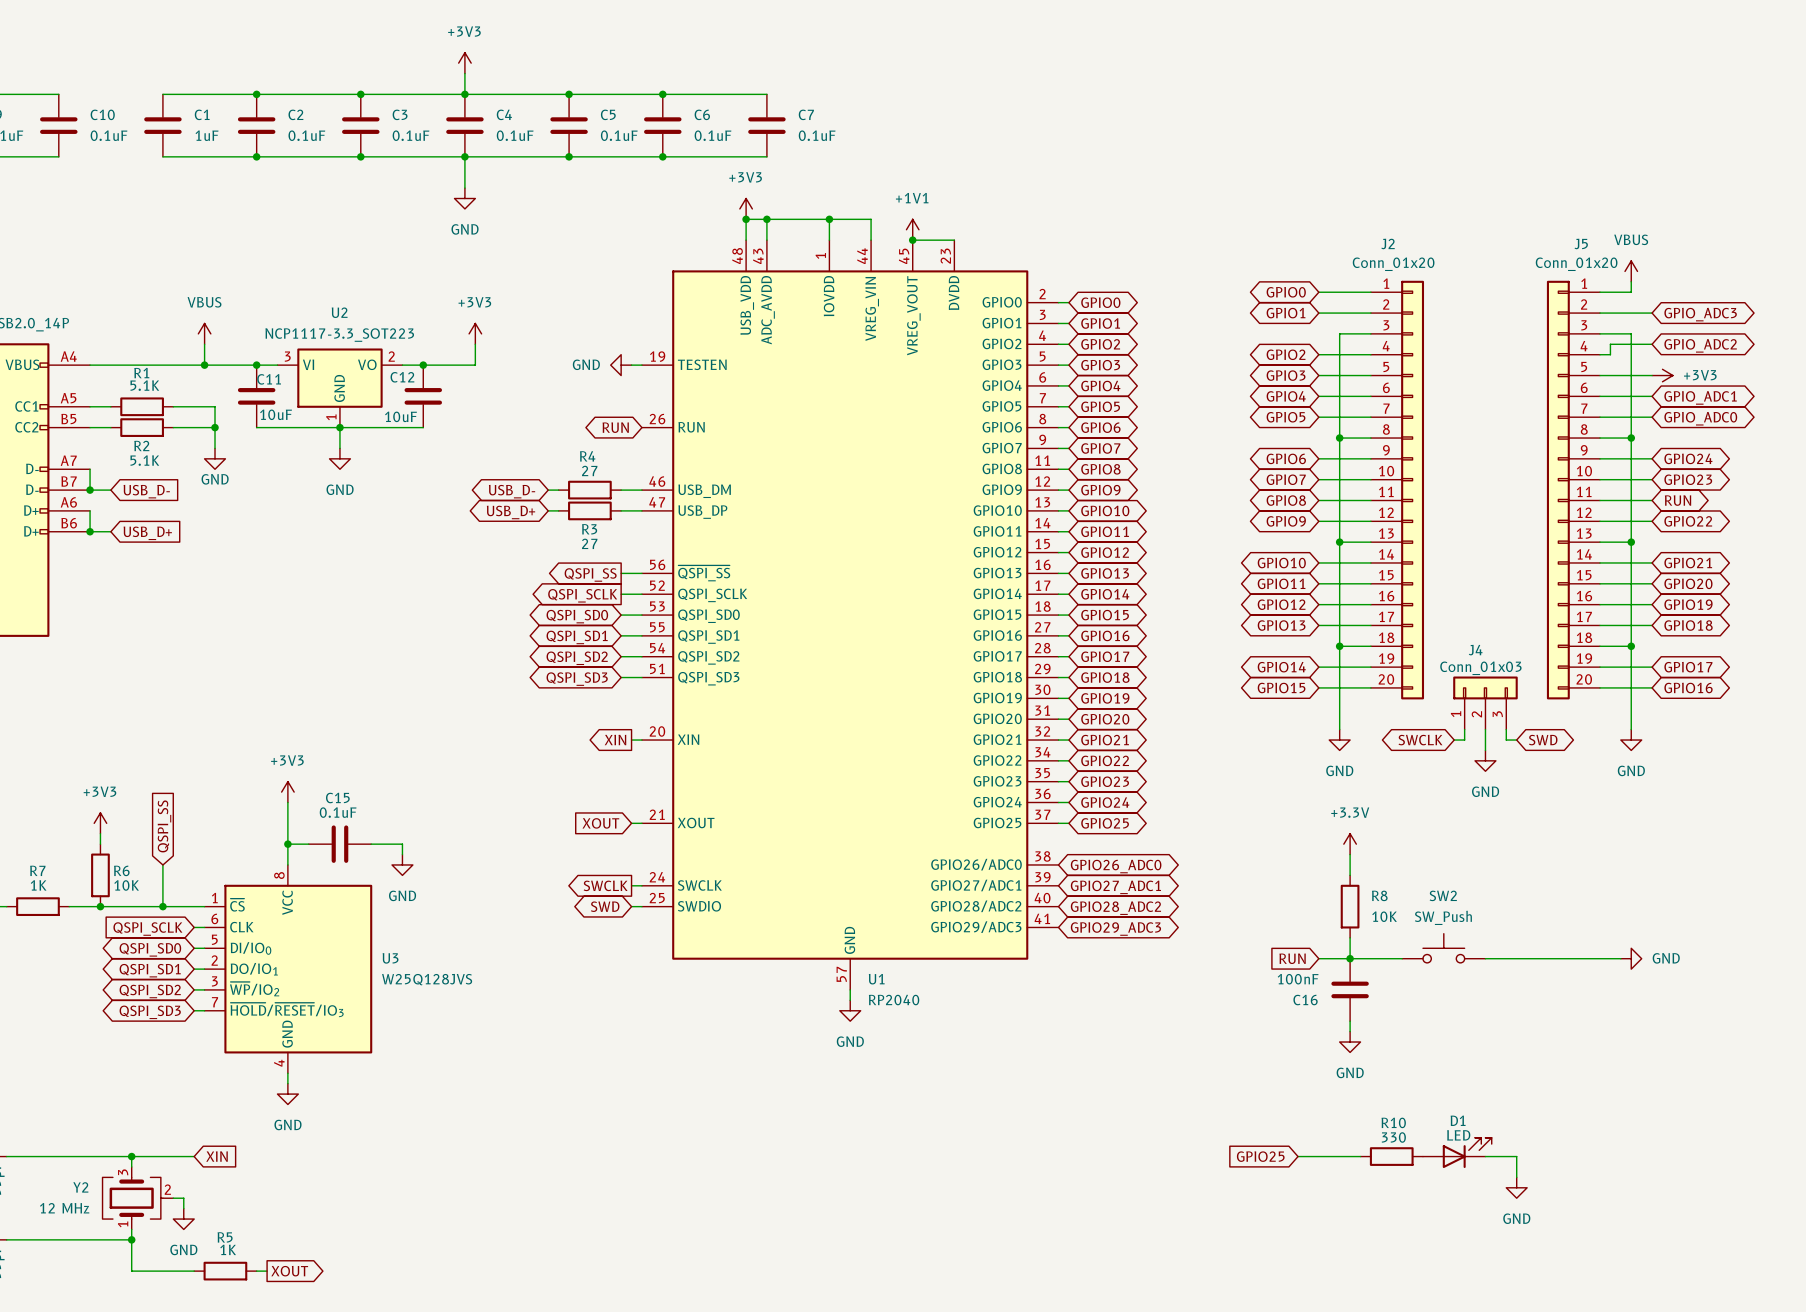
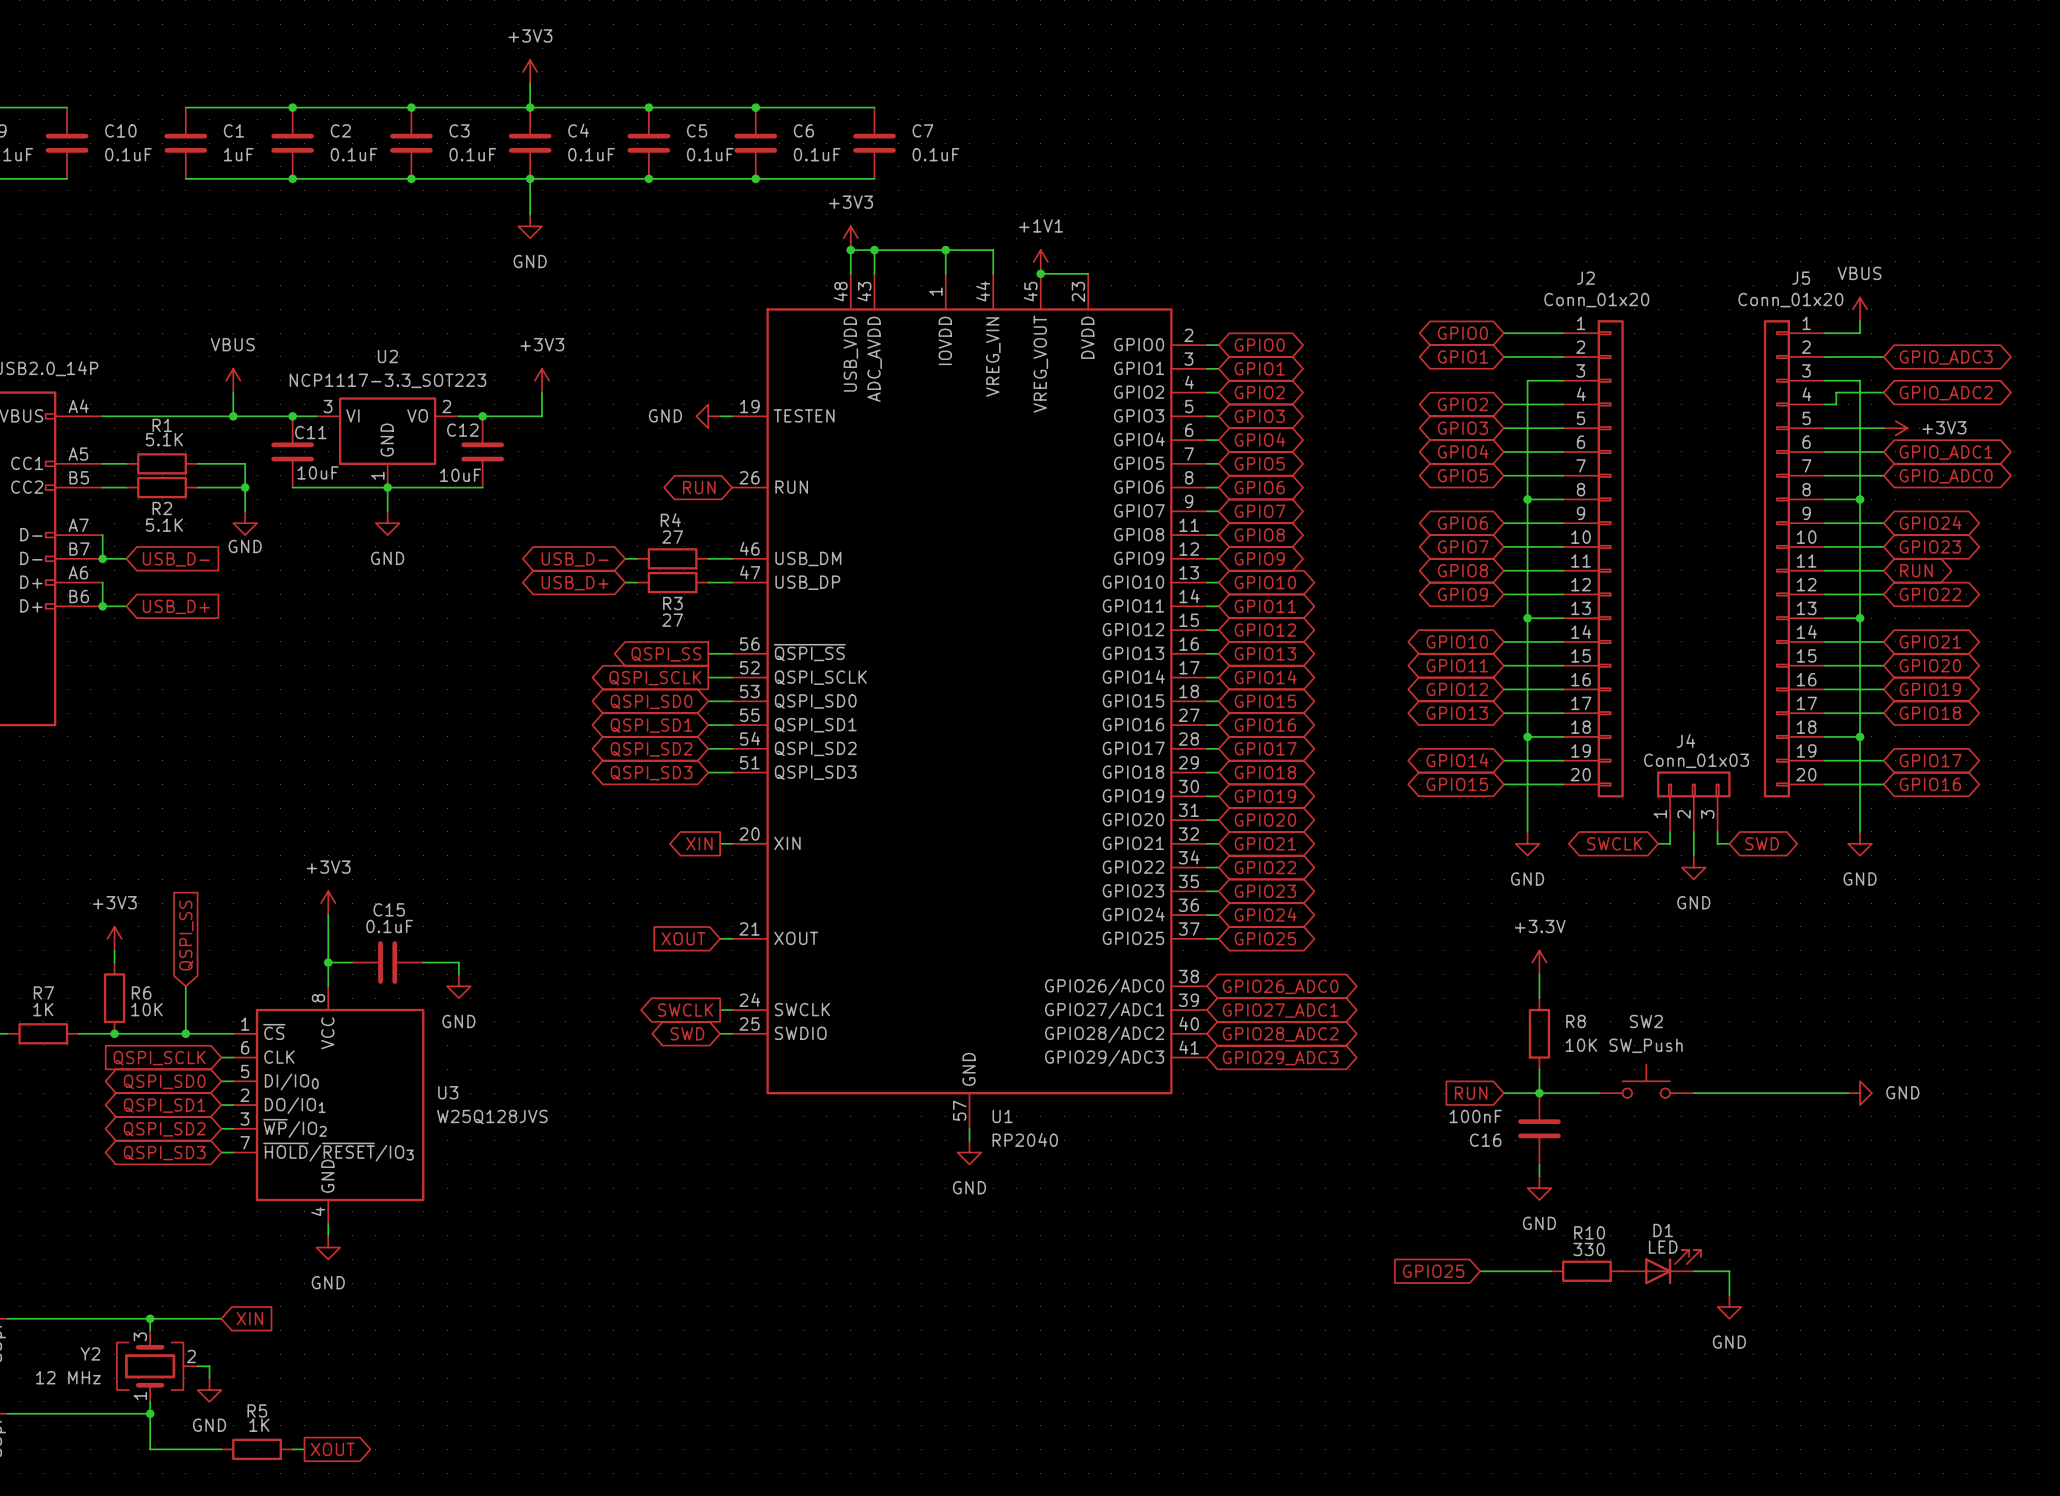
D1 position: (1457, 1152) -> (1661, 1267)
global label position: GPIO25 (1260, 1156) -> GPIO25 (1433, 1271)
wire: (1298, 1156) (1360, 1156) -> (1480, 1271) (1551, 1271)
R10 position: (1391, 1156) -> (1586, 1271)
wire: (1485, 1156) (1516, 1156) (1516, 1177) -> (1693, 1271) (1729, 1271) (1729, 1295)
power symbol position: GND (1516, 1187) -> GND (1729, 1306)

